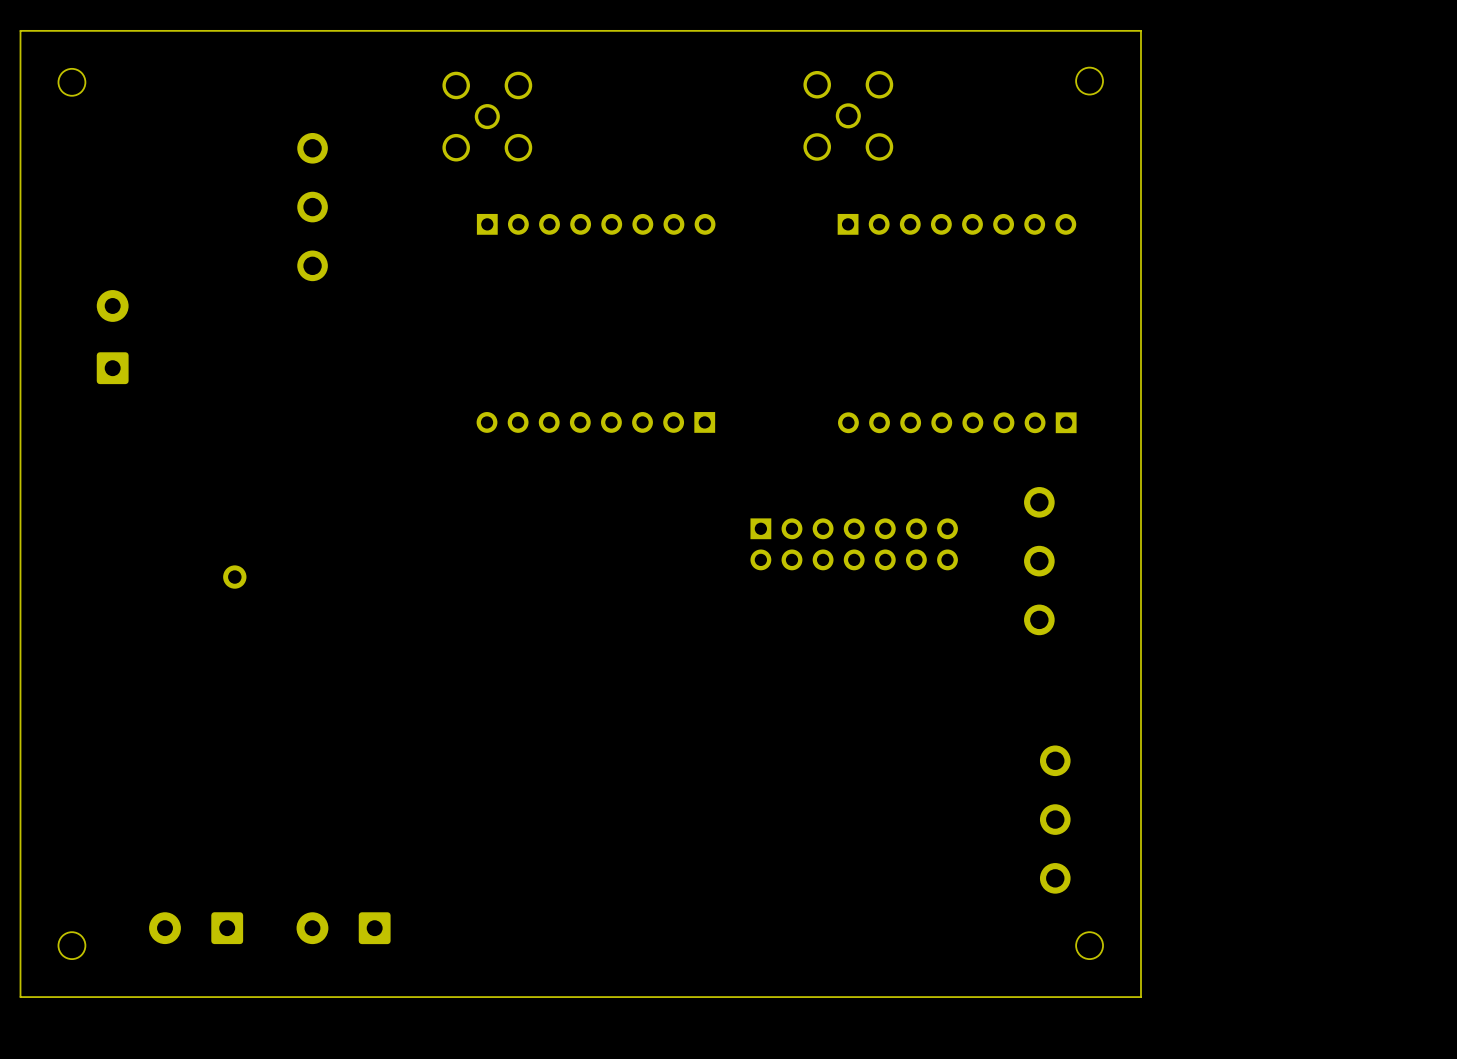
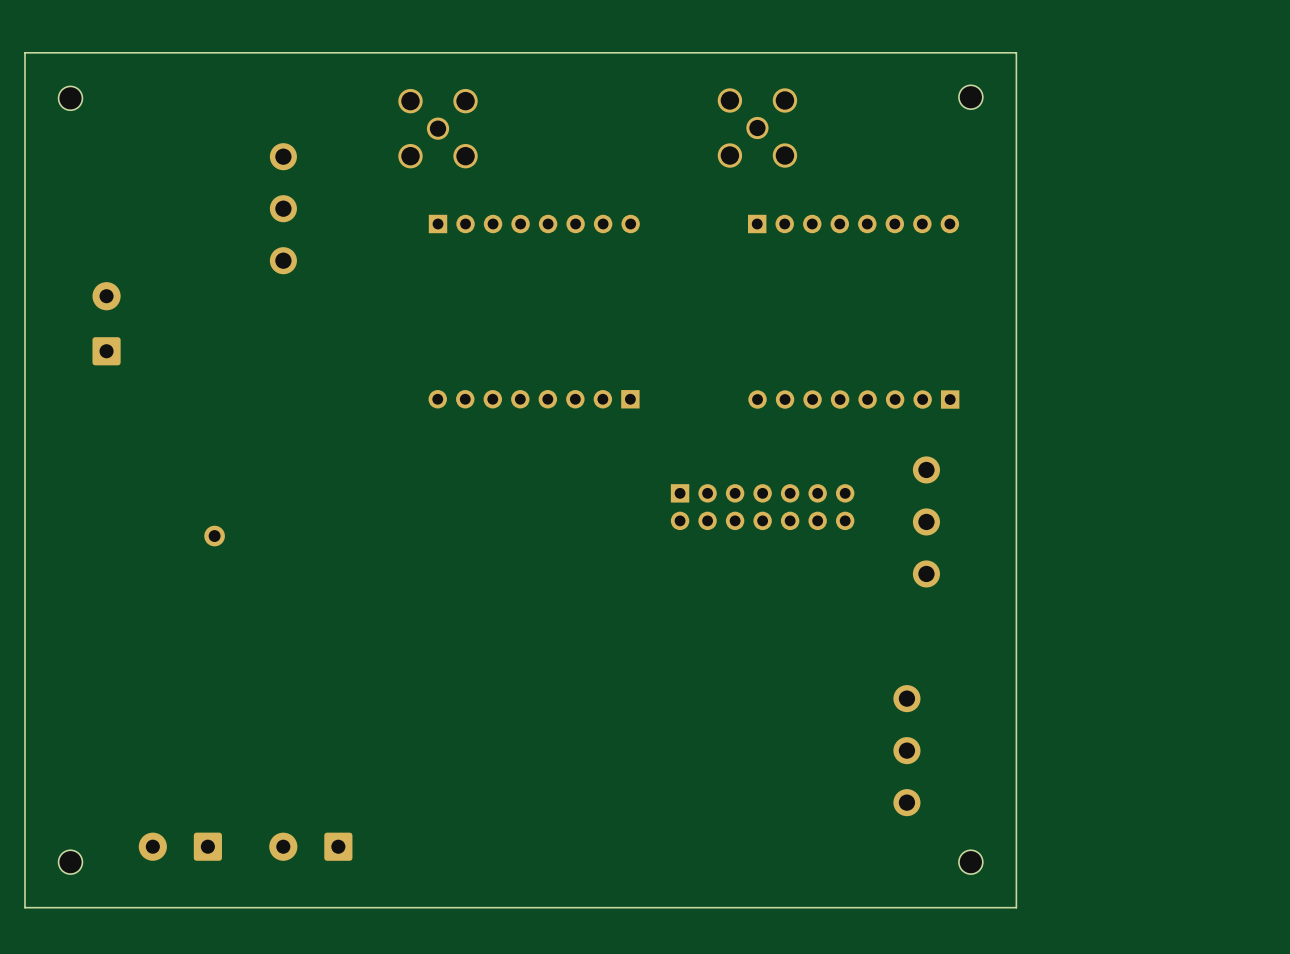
part position: (1055, 819) -> (906, 750)

